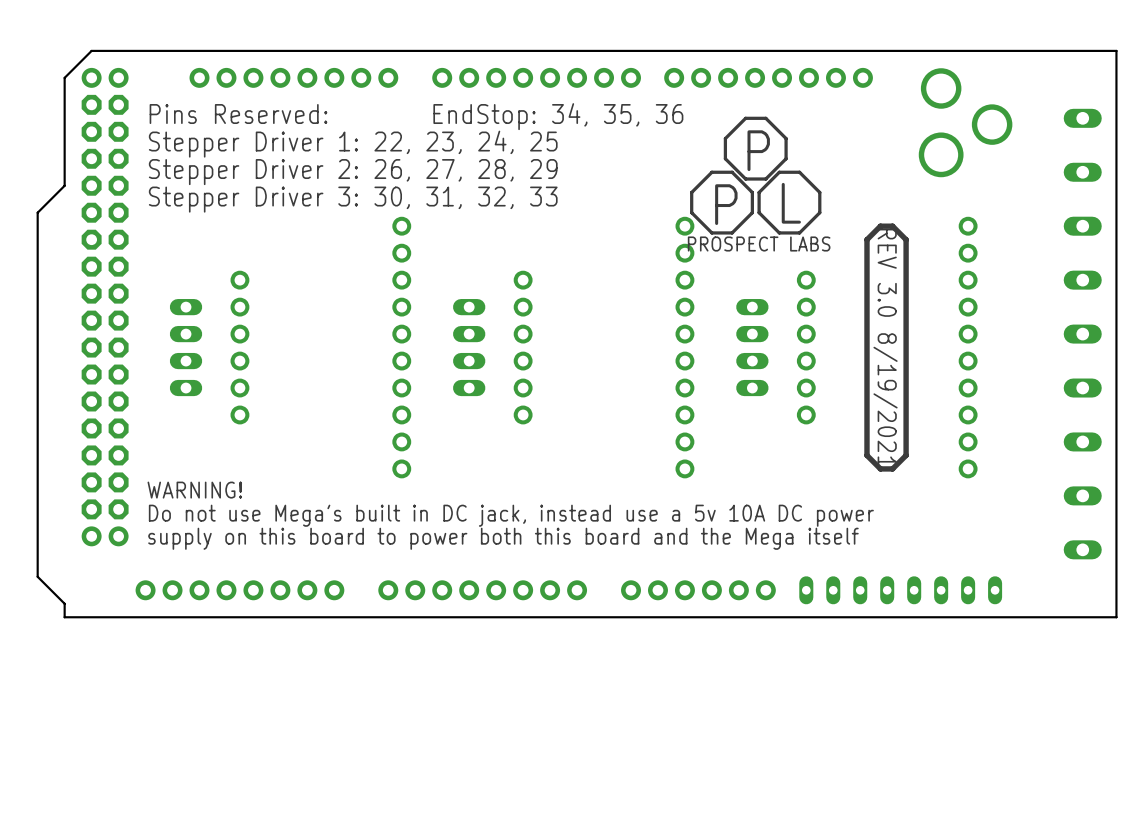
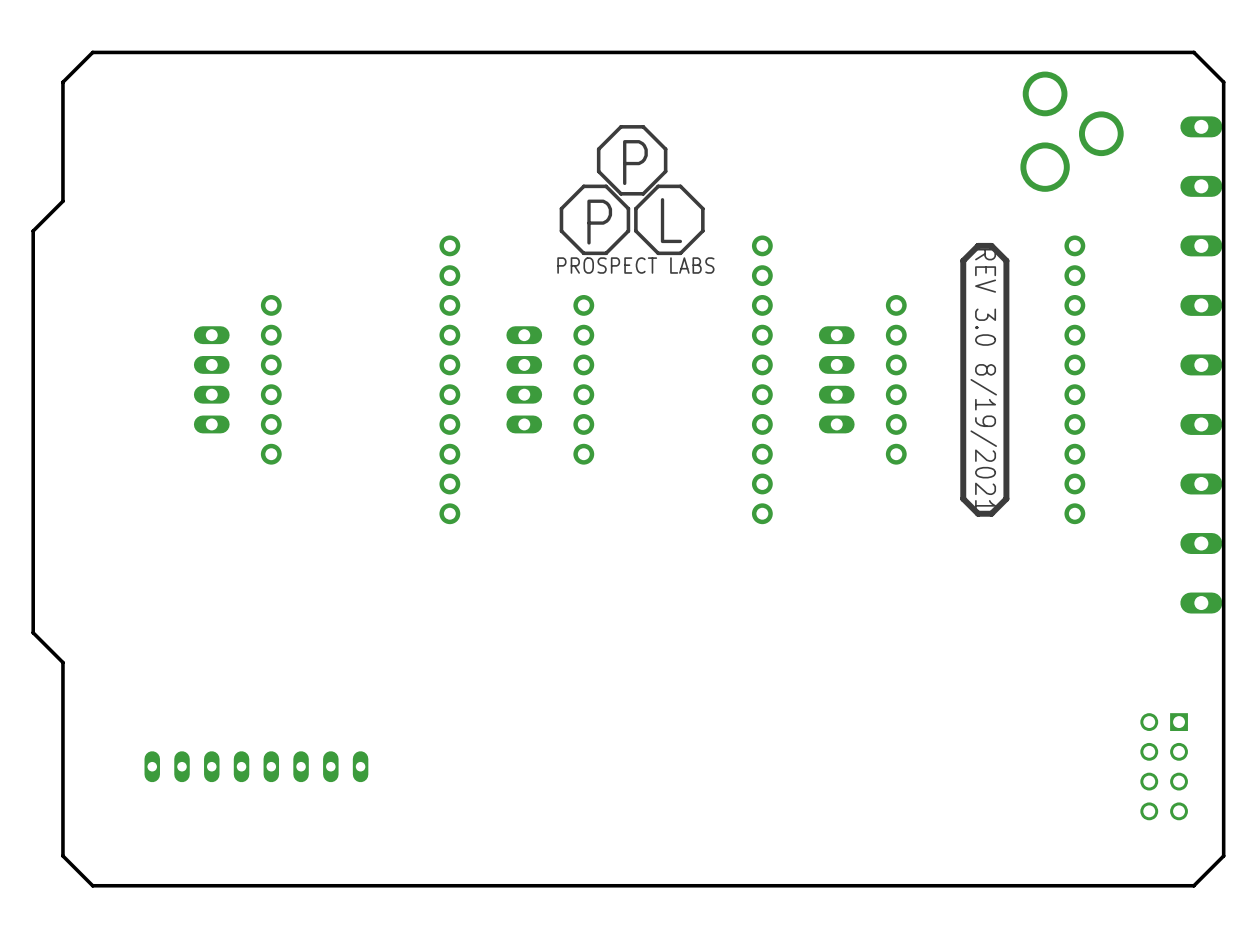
board edge: none -> (1193, 52) (1223, 82) (1223, 856) (1193, 885) (92, 885) (62, 856) (62, 662) (33, 632) (33, 231) (62, 201) (62, 82) (92, 52) (1193, 52)
text: Pins Reserved: EndStop: 34, 35, 36 (416, 116) -> none
line: (765, 118) (745, 118) (725, 138) (725, 158) (745, 179) (765, 179) (786, 158) (786, 138) (765, 118) -> (643, 126) (620, 126) (598, 149) (598, 171) (620, 193) (643, 193) (665, 171) (665, 149) (643, 126)
text: Stepper Driver 1: 22, 23, 24, 25 (353, 144) -> none
text: none -> P (635, 162)
text: P (758, 150) -> none
text: Stepper Driver 2: 26, 27, 28, 29 (353, 172) -> none
line: (732, 172) (711, 172) (691, 192) (691, 212) (711, 232) (732, 232) (752, 212) (752, 192) (732, 172) -> (606, 186) (583, 186) (561, 208) (561, 231) (583, 253) (606, 253) (628, 231) (628, 208) (606, 186)
line: (799, 172) (779, 172) (759, 192) (759, 212) (779, 232) (799, 232) (819, 212) (819, 192) (799, 172) -> (680, 186) (658, 186) (635, 208) (635, 231) (658, 253) (680, 253) (702, 231) (702, 208) (680, 186)
text: Stepper Driver 3: 30, 31, 32, 33 (353, 199) -> none
text position: L (791, 203) -> L (671, 220)
text: none -> P (599, 222)
text: P (726, 204) -> none
text position: PROSPECT LABS (759, 244) -> PROSPECT LABS (635, 265)
part: (577, 334) -> none
text: WARNING! (194, 490) -> none
text: Do not use Mega's built in DC jack, instead use a 5v 10A DC power (511, 515) -> none
text: supply on this board to power both this board and the Mega itself (503, 538) -> none
part: (900, 590) -> none
part: none -> (256, 766)
part: none -> (1164, 766)

